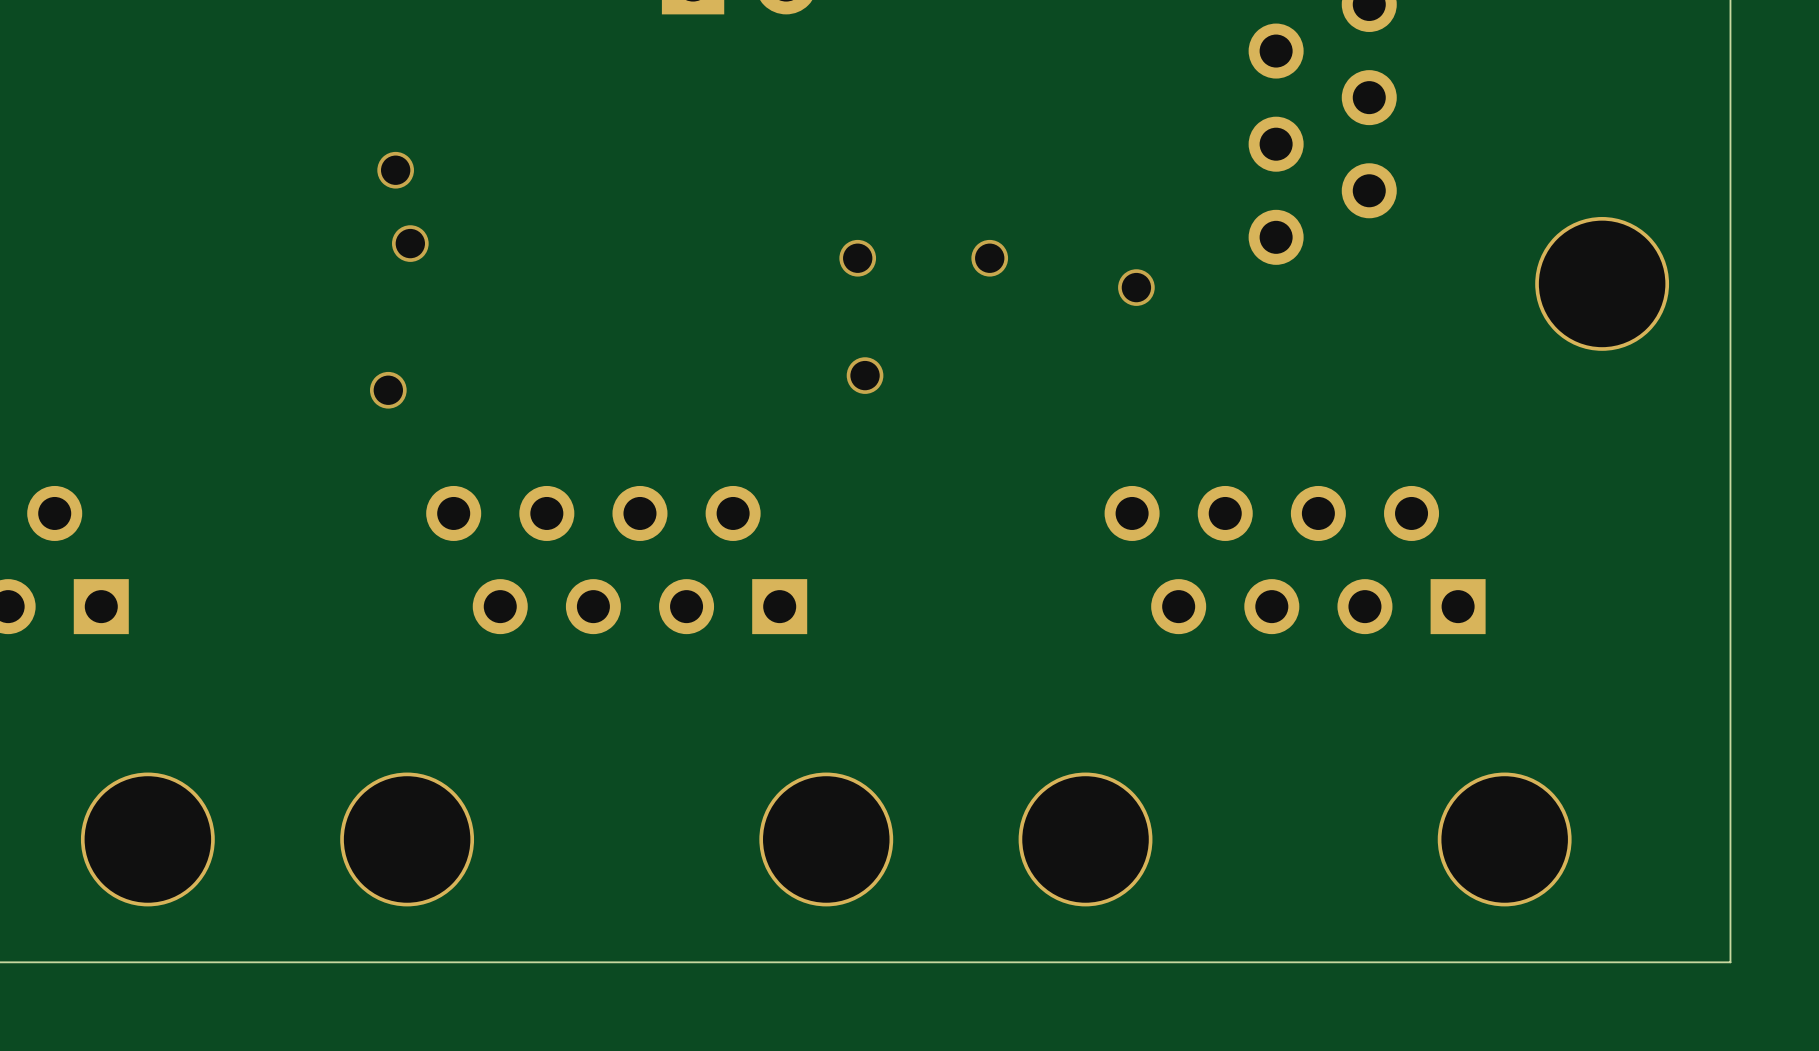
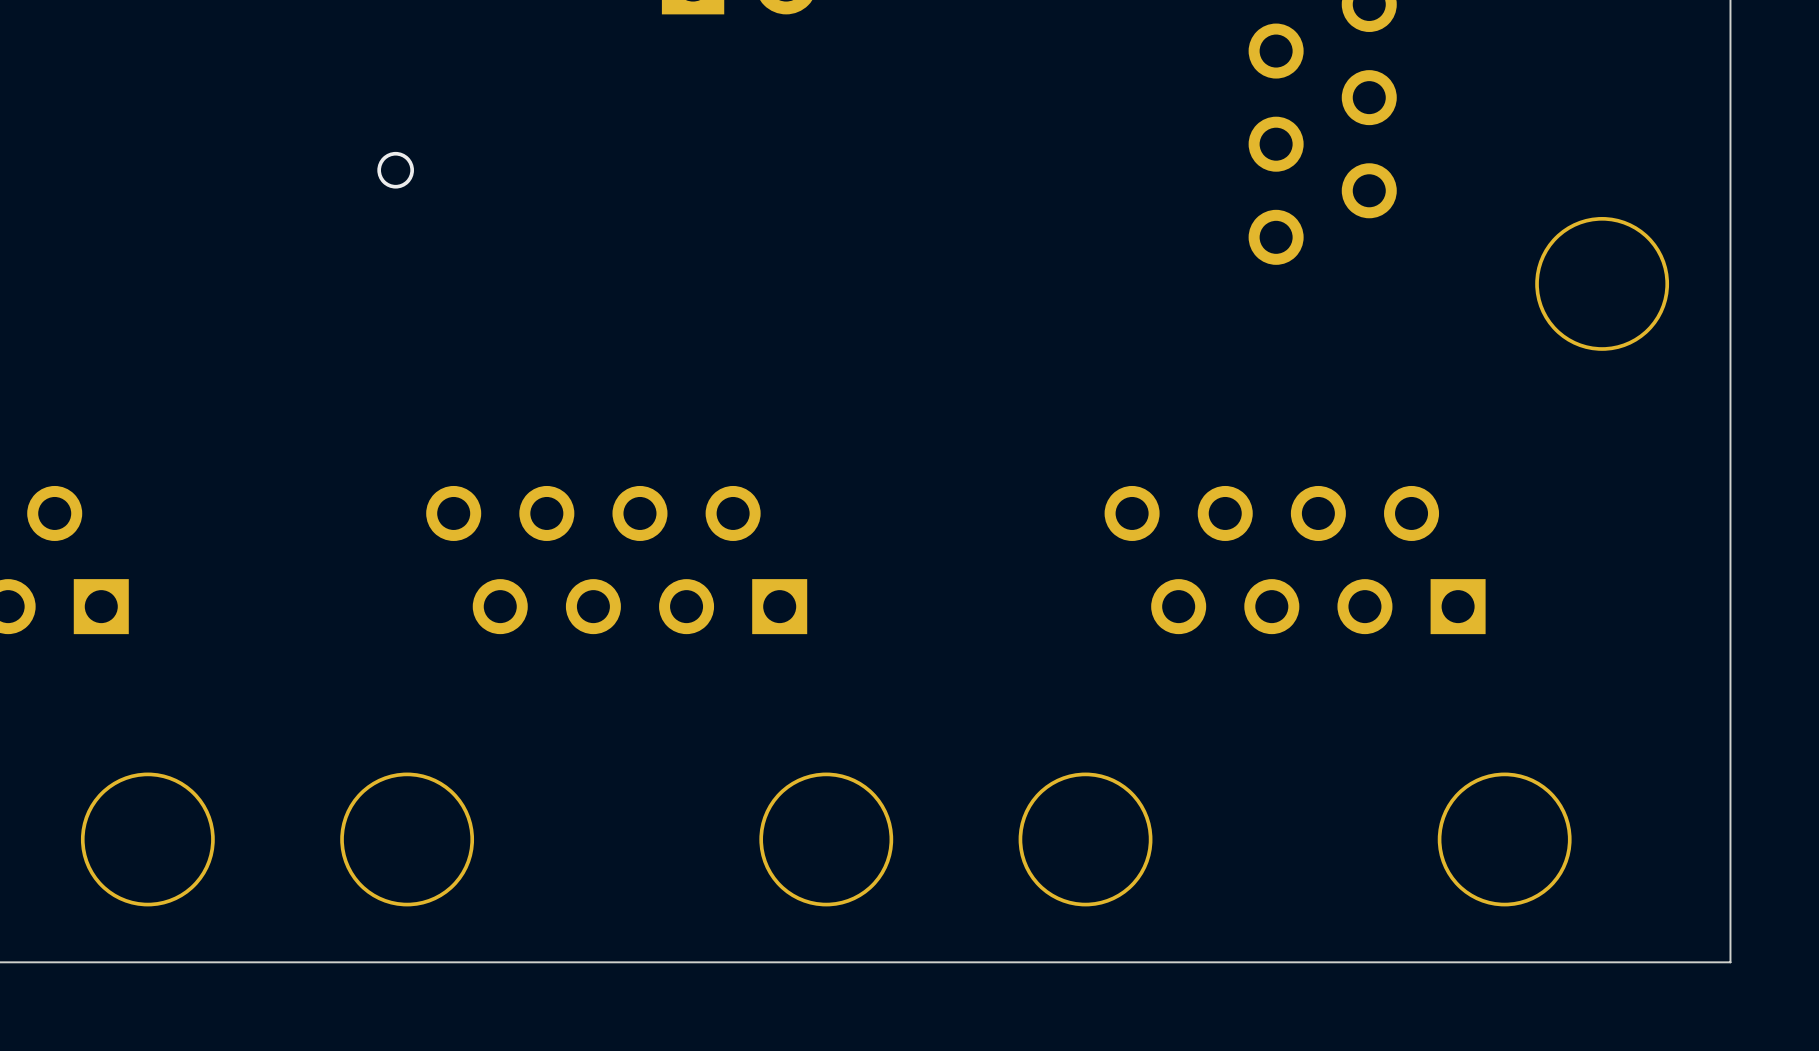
via: (410, 243) -> none
via: (857, 258) -> none
via: (989, 258) -> none
via: (1136, 287) -> none
via: (865, 375) -> none
via: (388, 390) -> none

